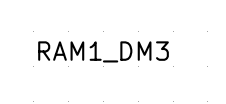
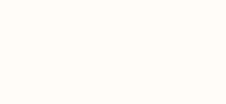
label: RAM1_DM3 (103, 51) -> none

